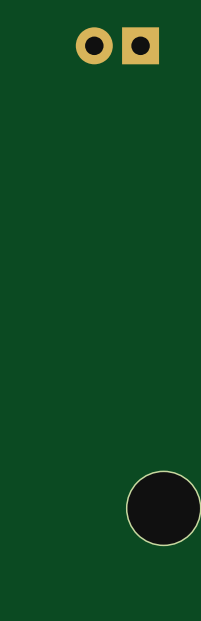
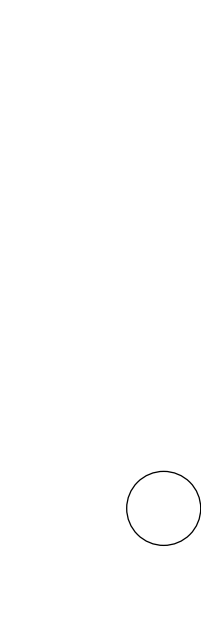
part: (117, 45) -> none

